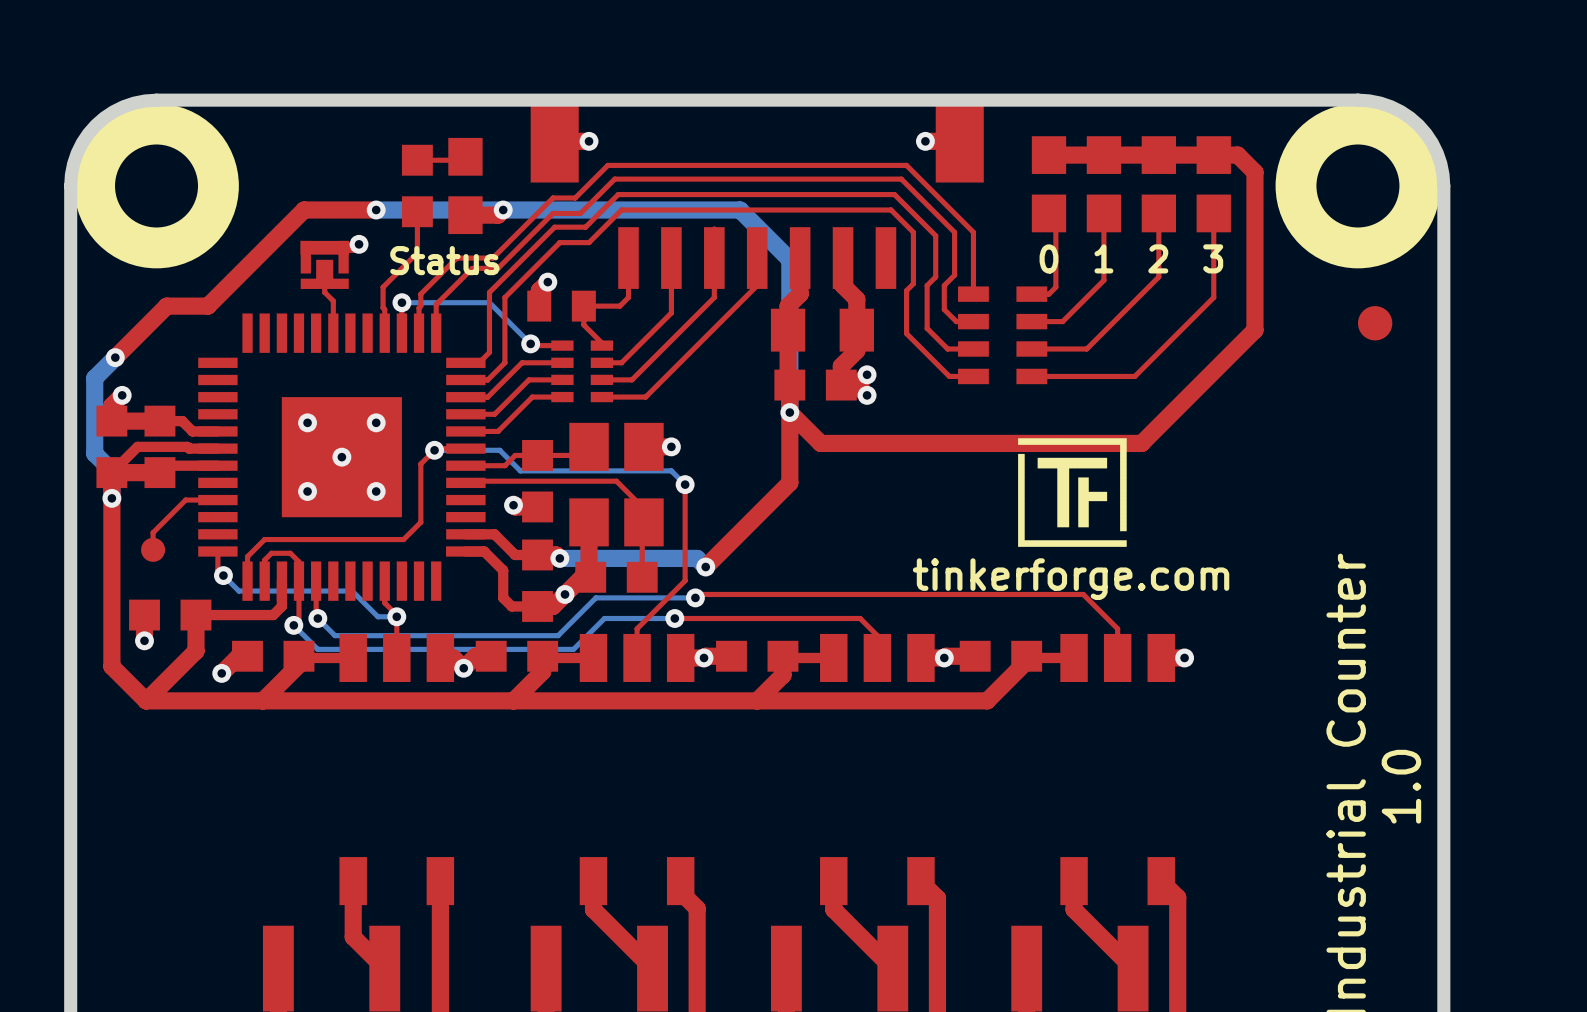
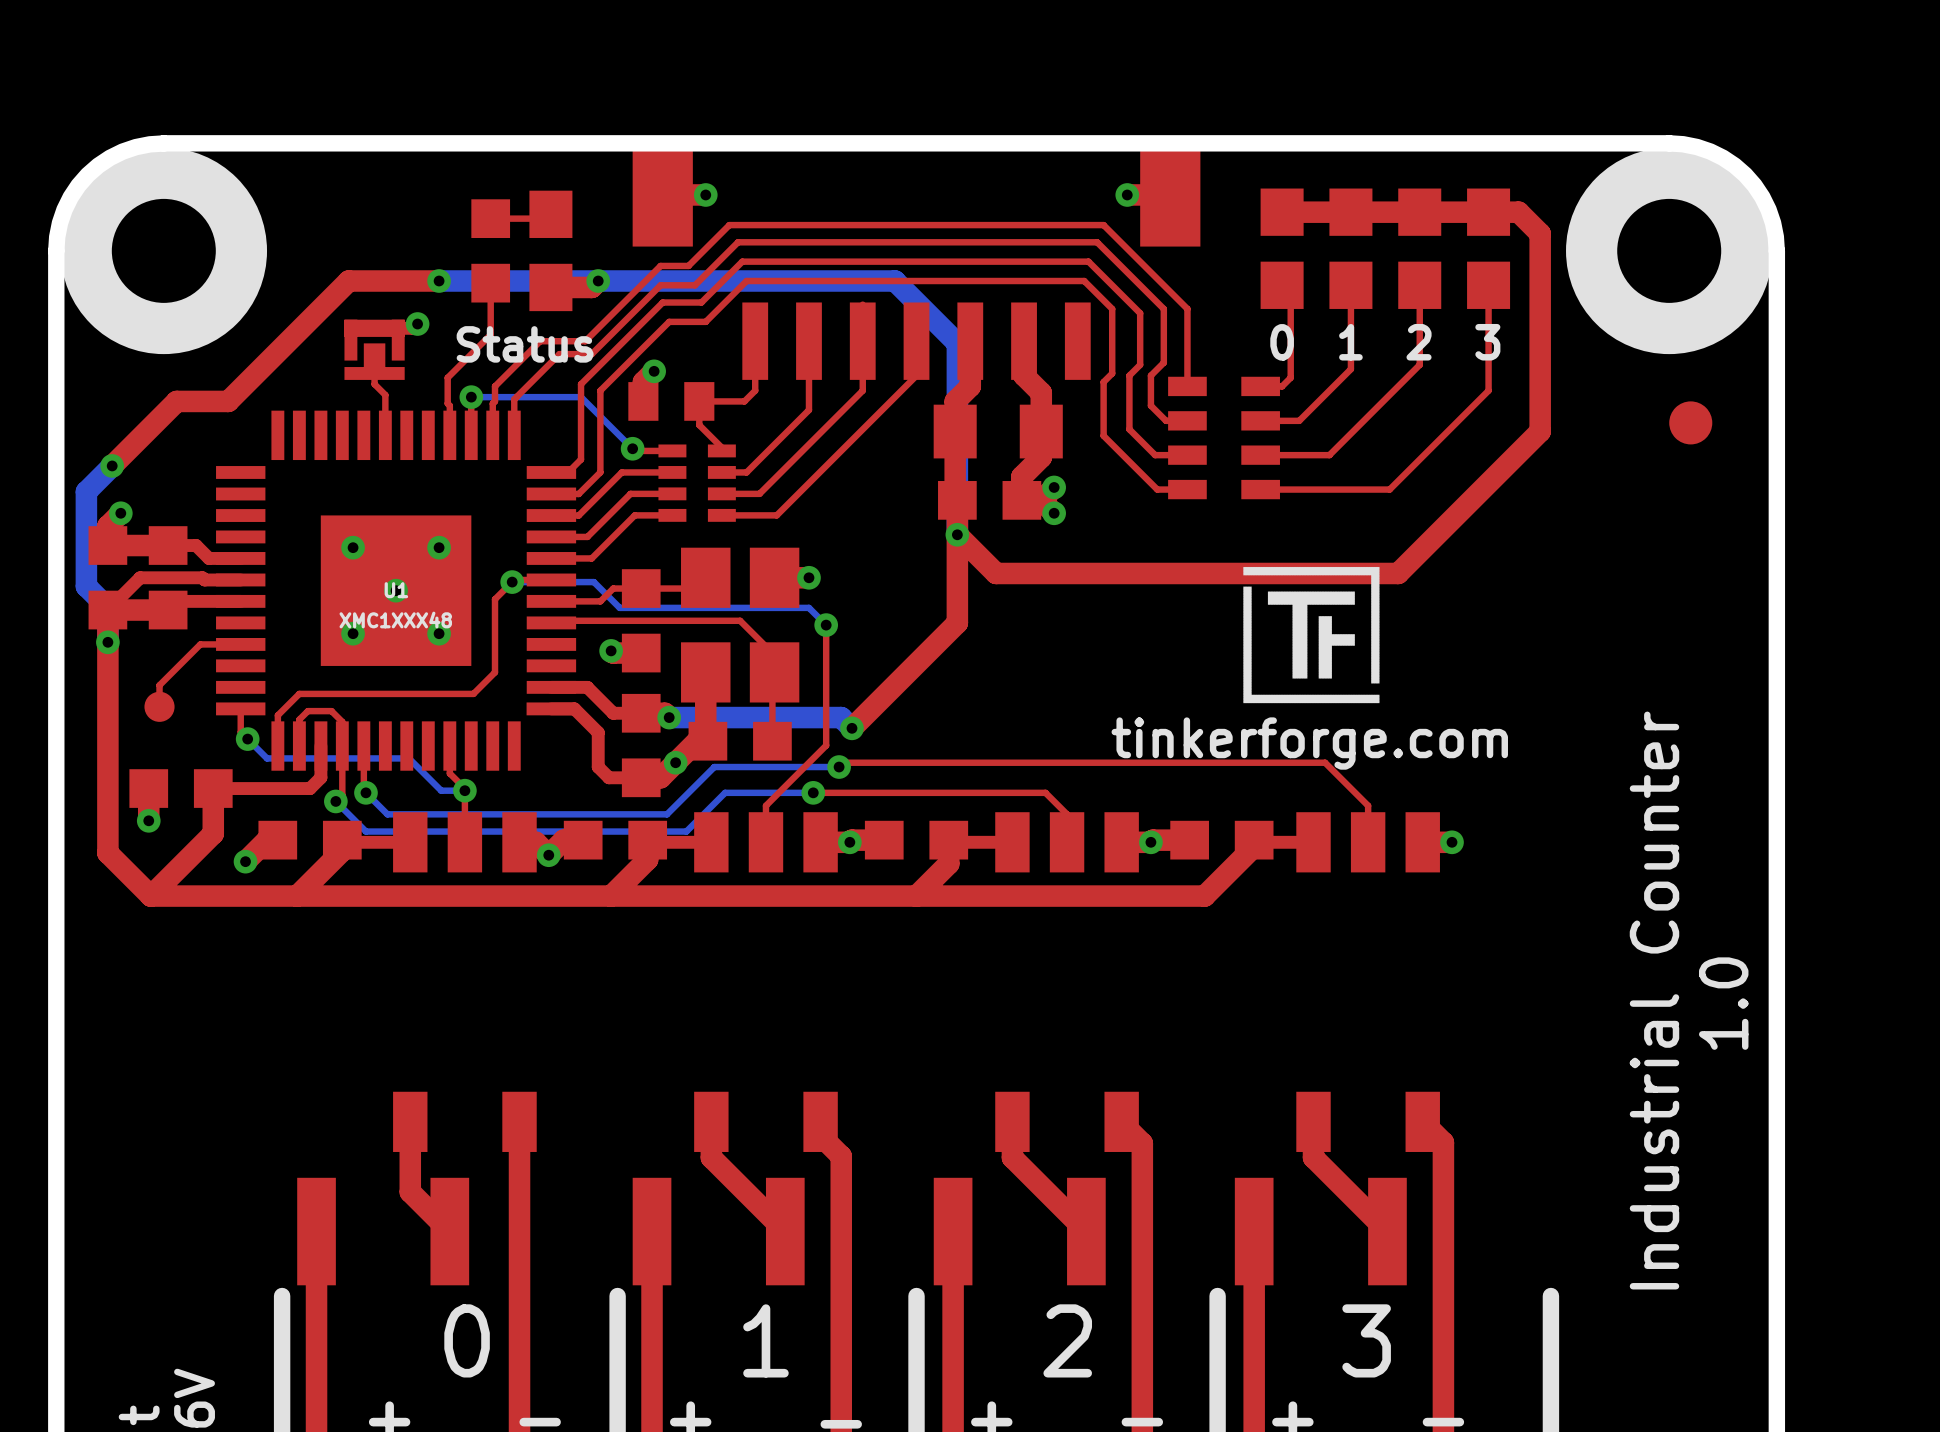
U1 name: none -> U1 (396, 590)
U1 value: none -> XMC1XXX48 (395, 620)

